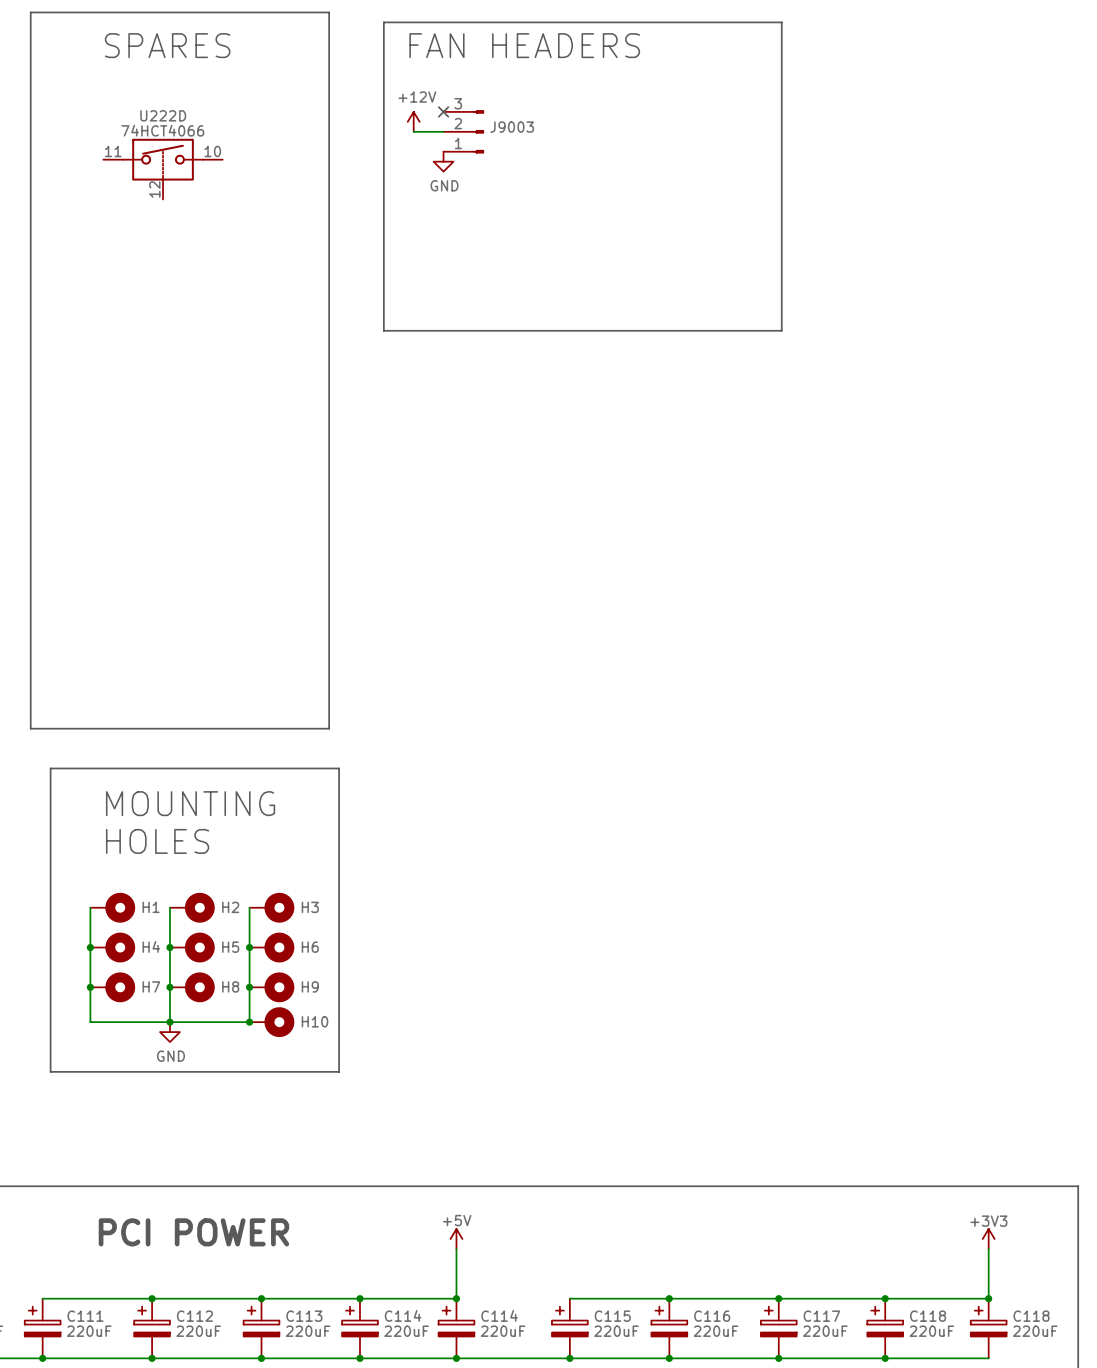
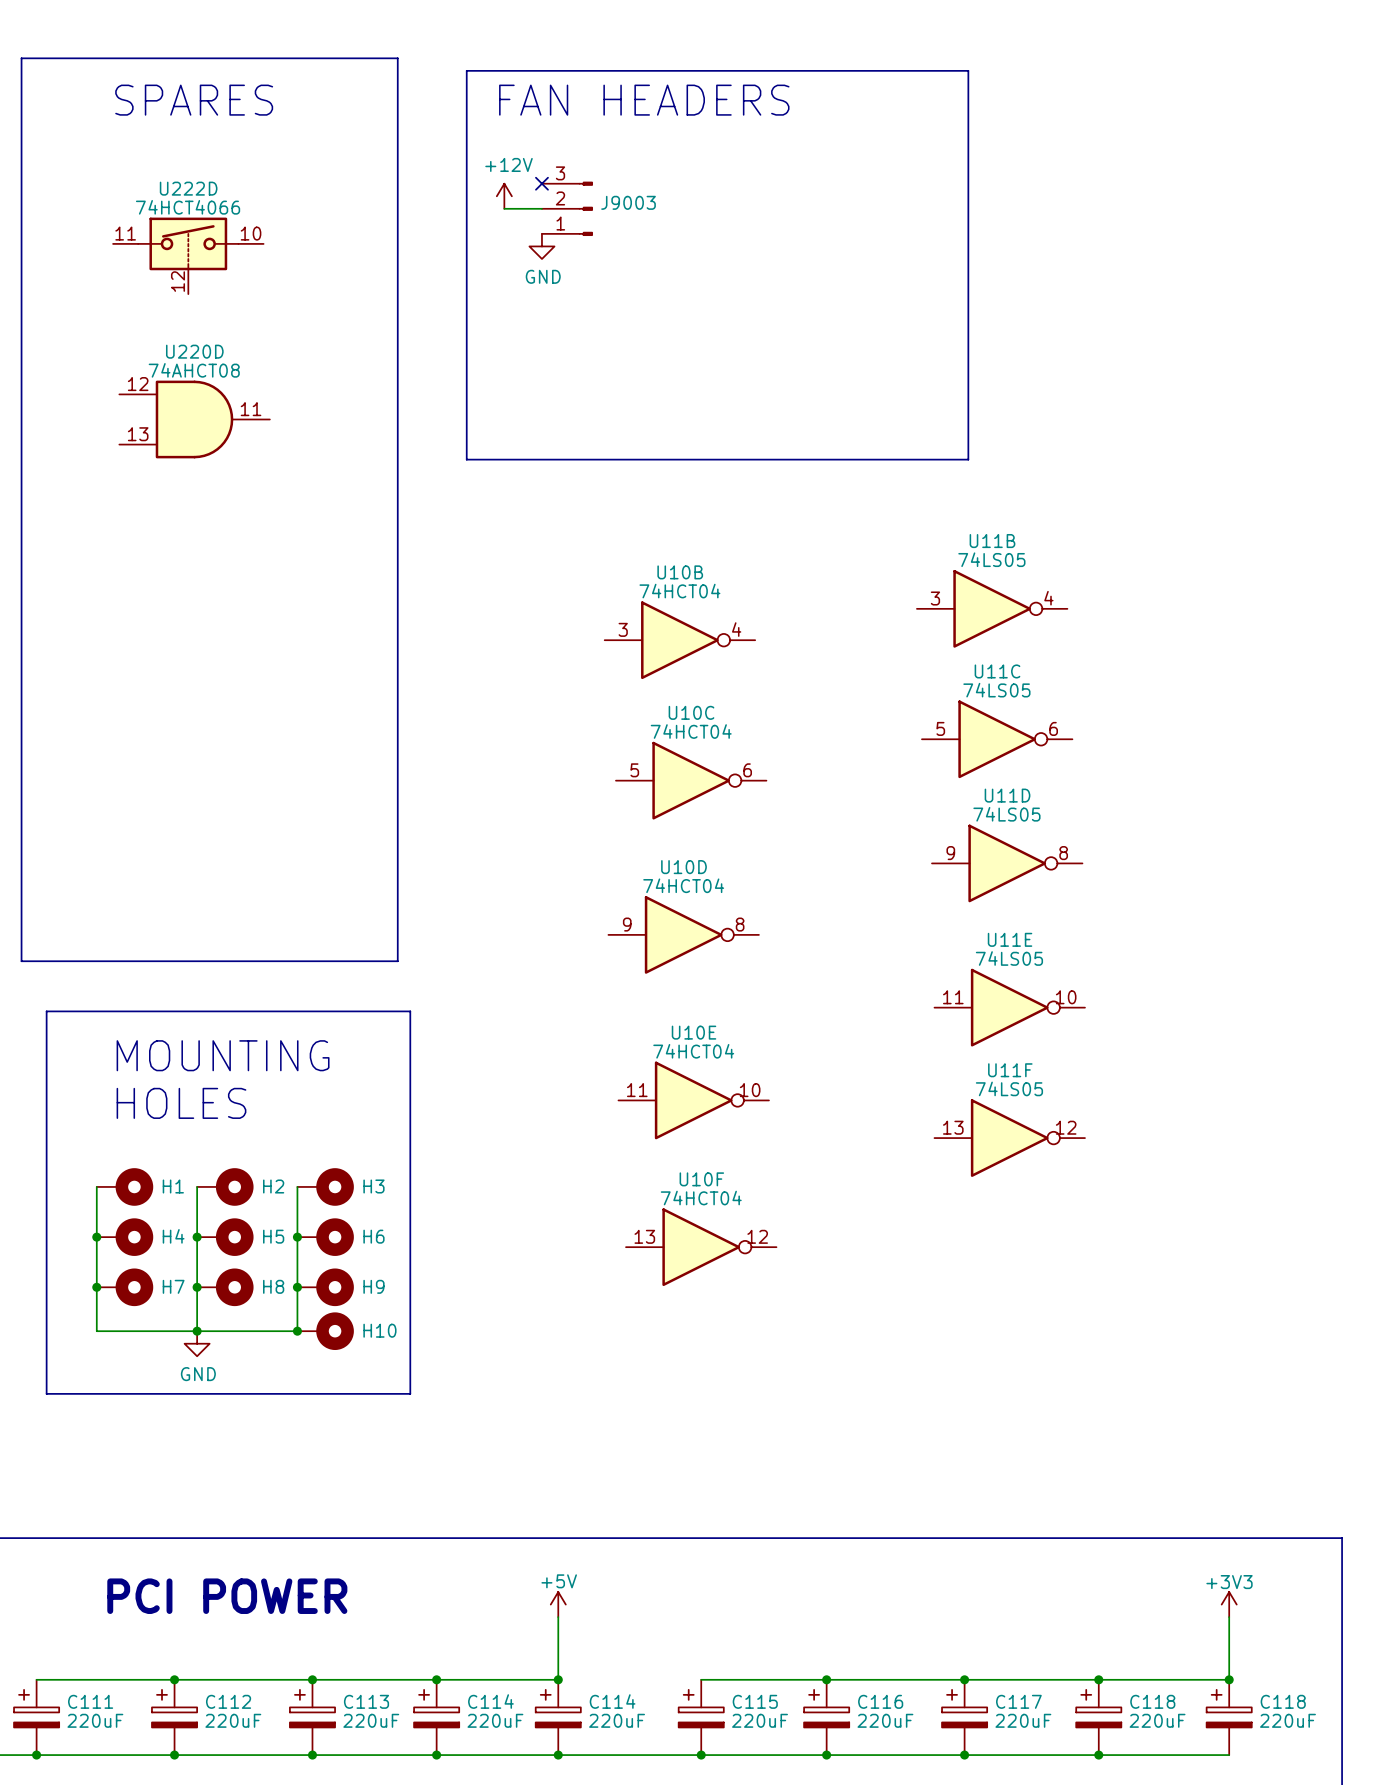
U220D: none -> 74AHCT08 (194, 419)
U11B: none -> 74LS05 (992, 608)
U10B: none -> 74HCT04 (679, 640)
U11C: none -> 74LS05 (997, 739)
U10C: none -> 74HCT04 (691, 780)
U11D: none -> 74LS05 (1007, 863)
U10D: none -> 74HCT04 (683, 934)
U11E: none -> 74LS05 (1009, 1007)
U10E: none -> 74HCT04 (693, 1100)
U11F: none -> 74LS05 (1009, 1138)
U10F: none -> 74HCT04 (701, 1247)

